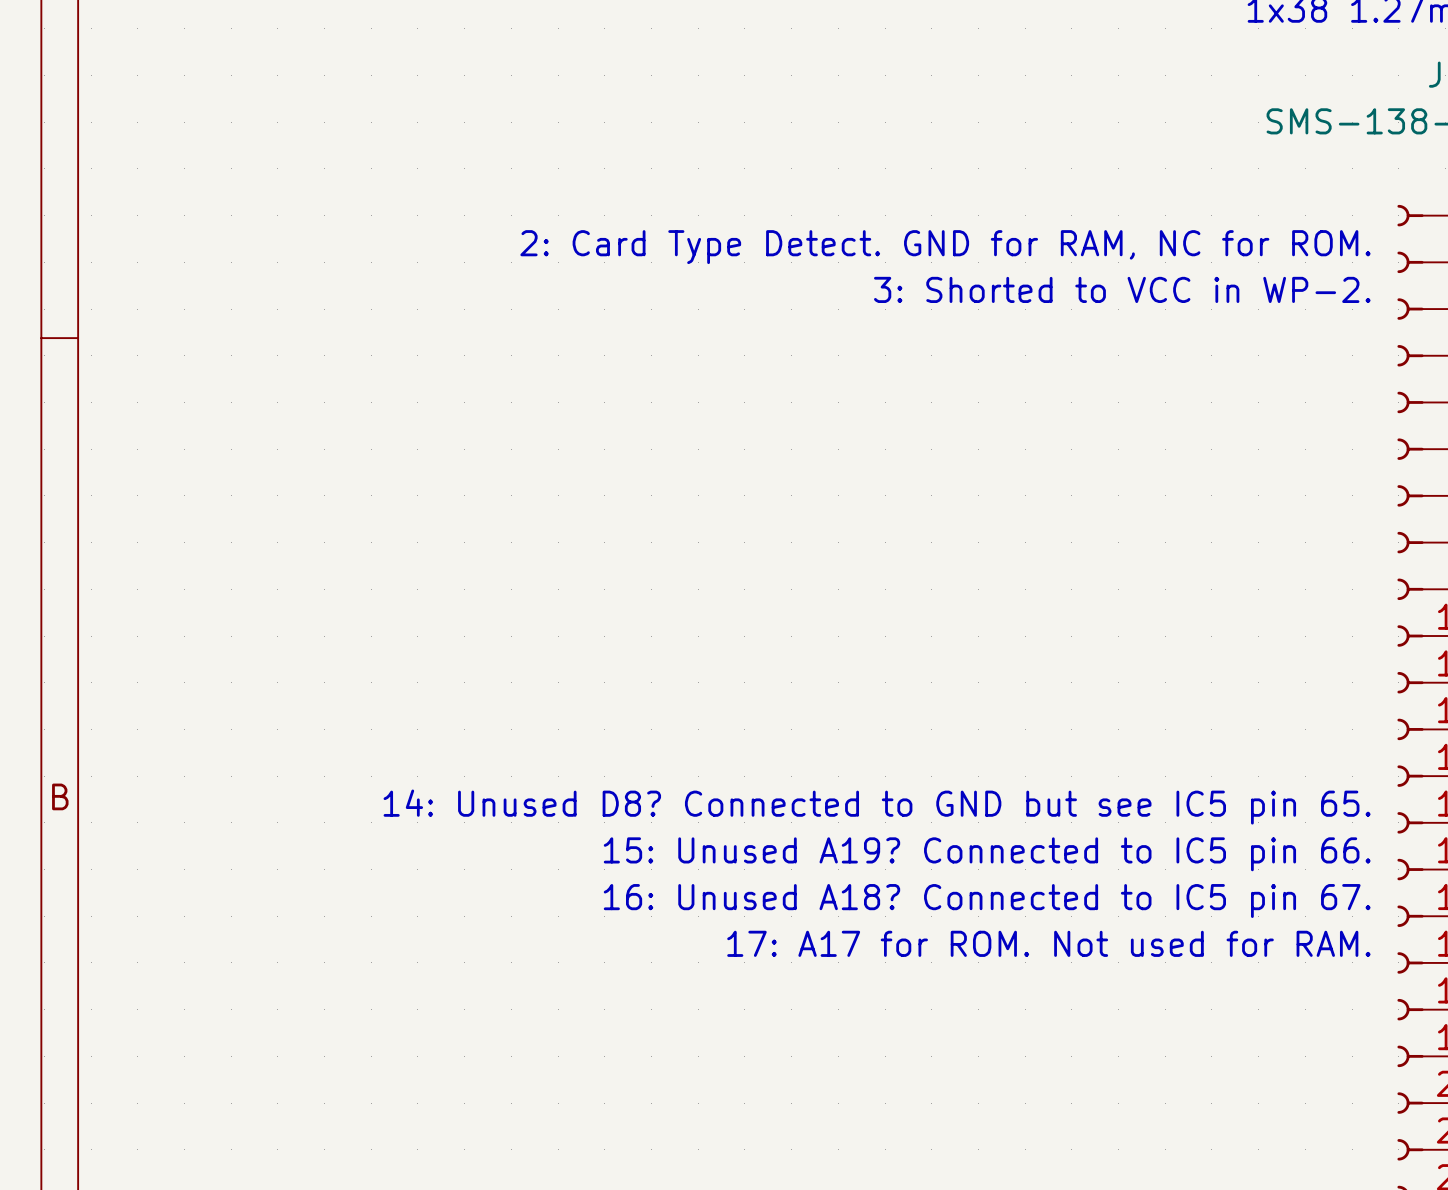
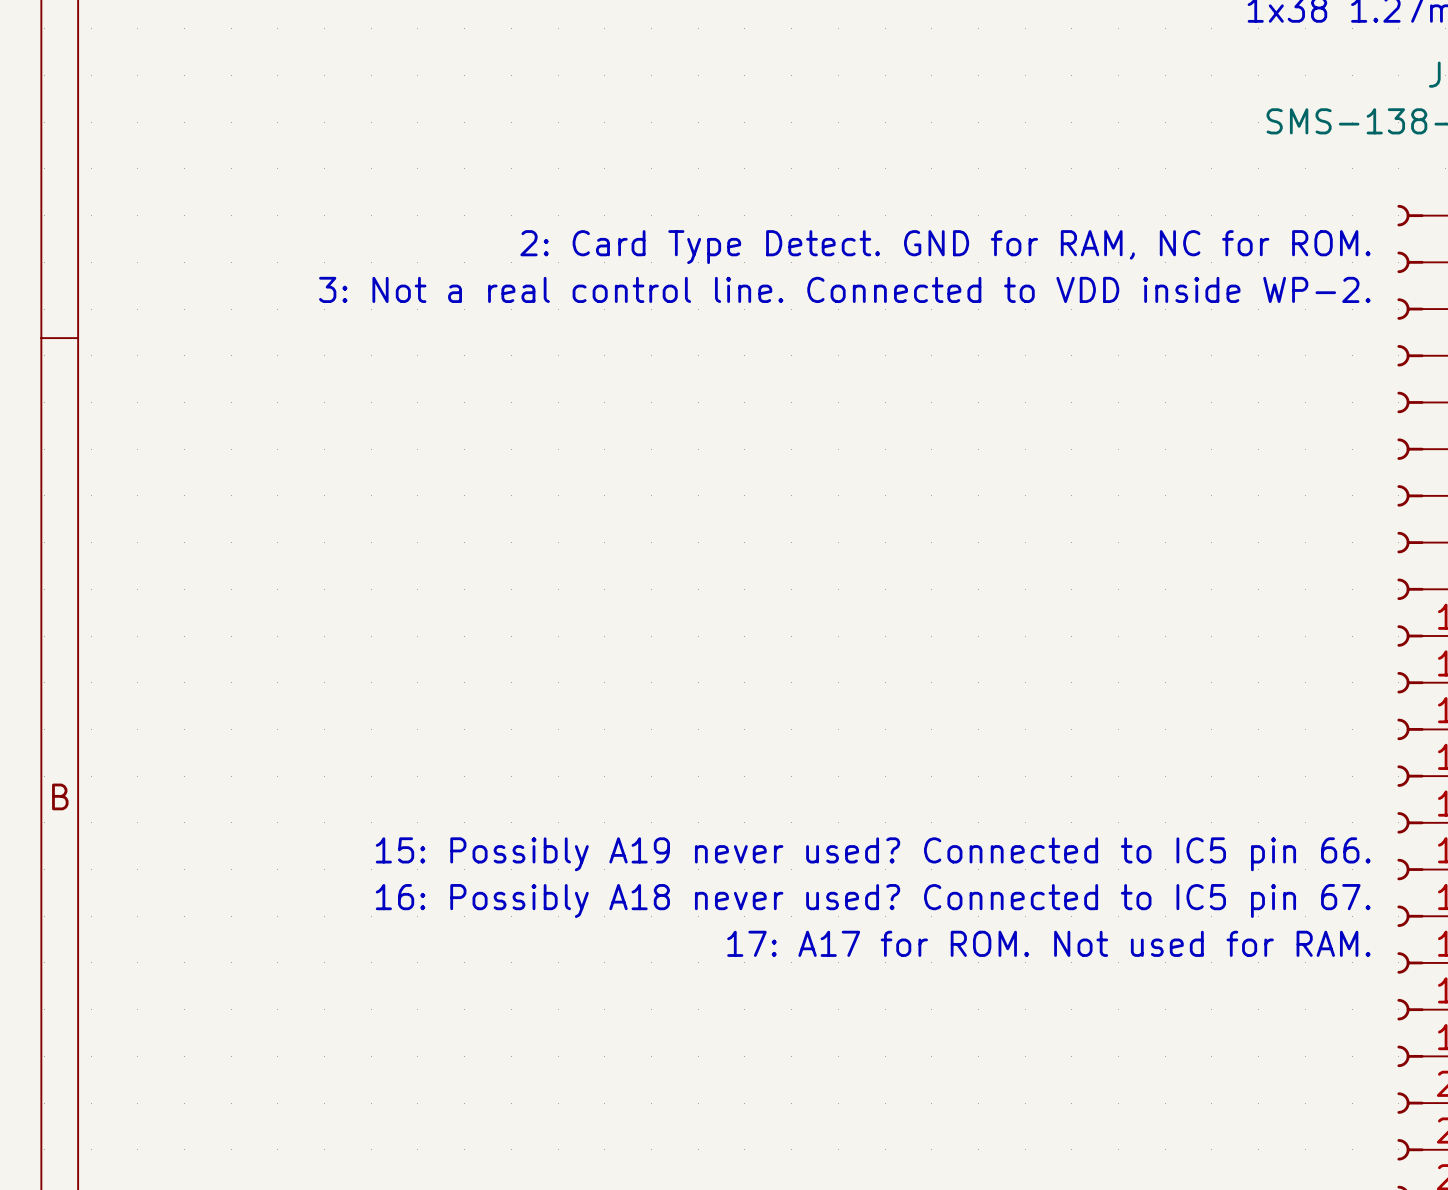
text: 3: Shorted to VCC in WP-2. (1122, 289) -> 3: Not a real control line. Connected to VDD inside WP-2. (844, 289)
text: 14: Unused D8? Connected to GND but see IC5 pin 65. (877, 807) -> none
text: 15: Unused A19? Connected to IC5 pin 66. (987, 854) -> 15: Possibly A19 never used? Connected to IC5 pin 66. (873, 854)
text: 16: Unused A18? Connected to IC5 pin 67. (987, 901) -> 16: Possibly A18 never used? Connected to IC5 pin 67. (873, 901)

